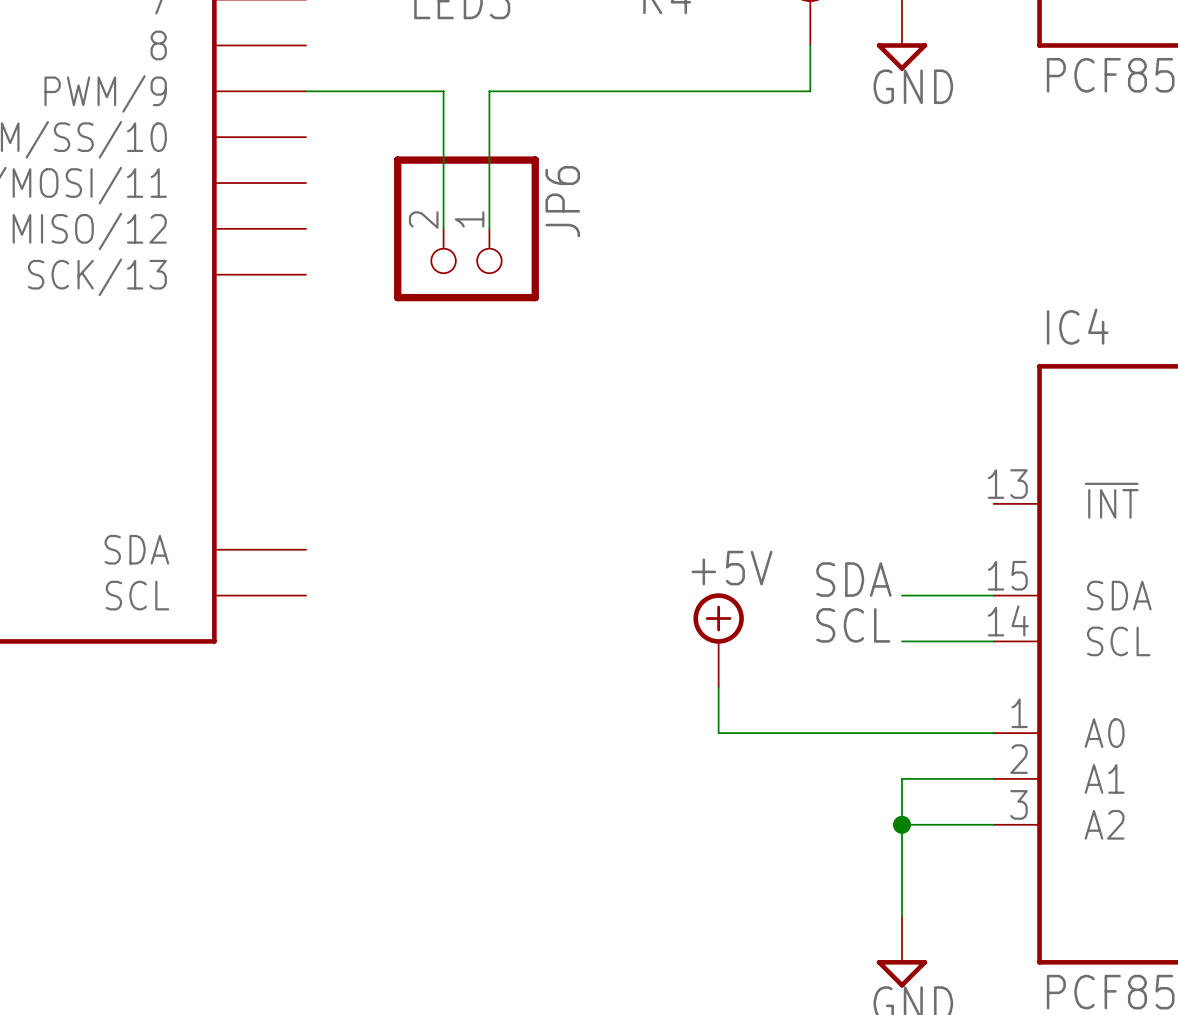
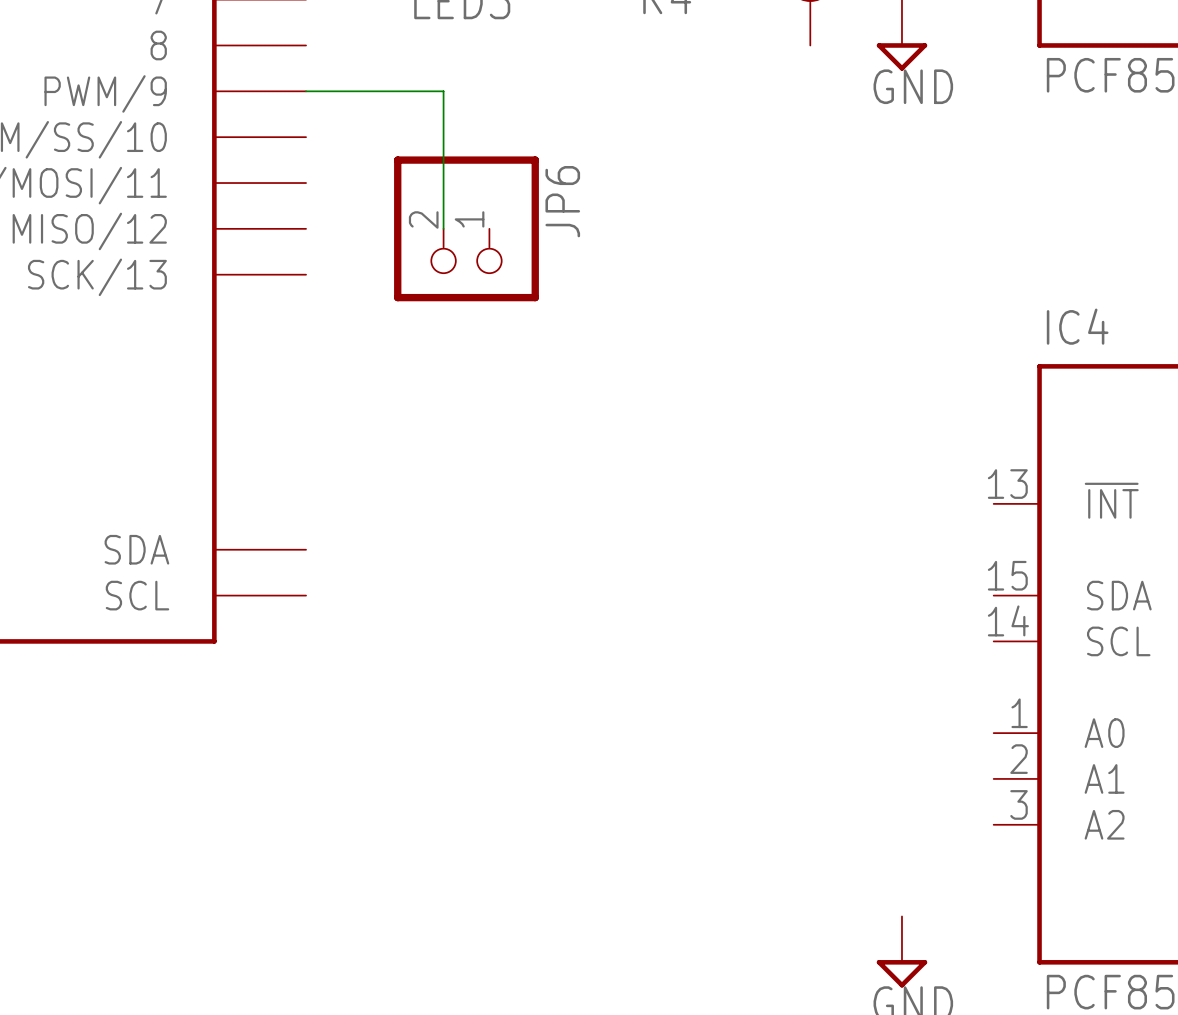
wire: (810, 45) (810, 91) (489, 91) (489, 228) -> none
label: SDA (853, 579) -> none
wire: (901, 595) (993, 595) -> none
label: SCL (853, 625) -> none
power symbol: +5V (718, 640) -> none
wire: (901, 641) (993, 641) -> none
wire: (718, 687) (718, 733) (993, 733) -> none
wire: (993, 778) (901, 778) (901, 916) -> none
wire: (901, 824) (993, 824) -> none
junction: (901, 824) -> none

